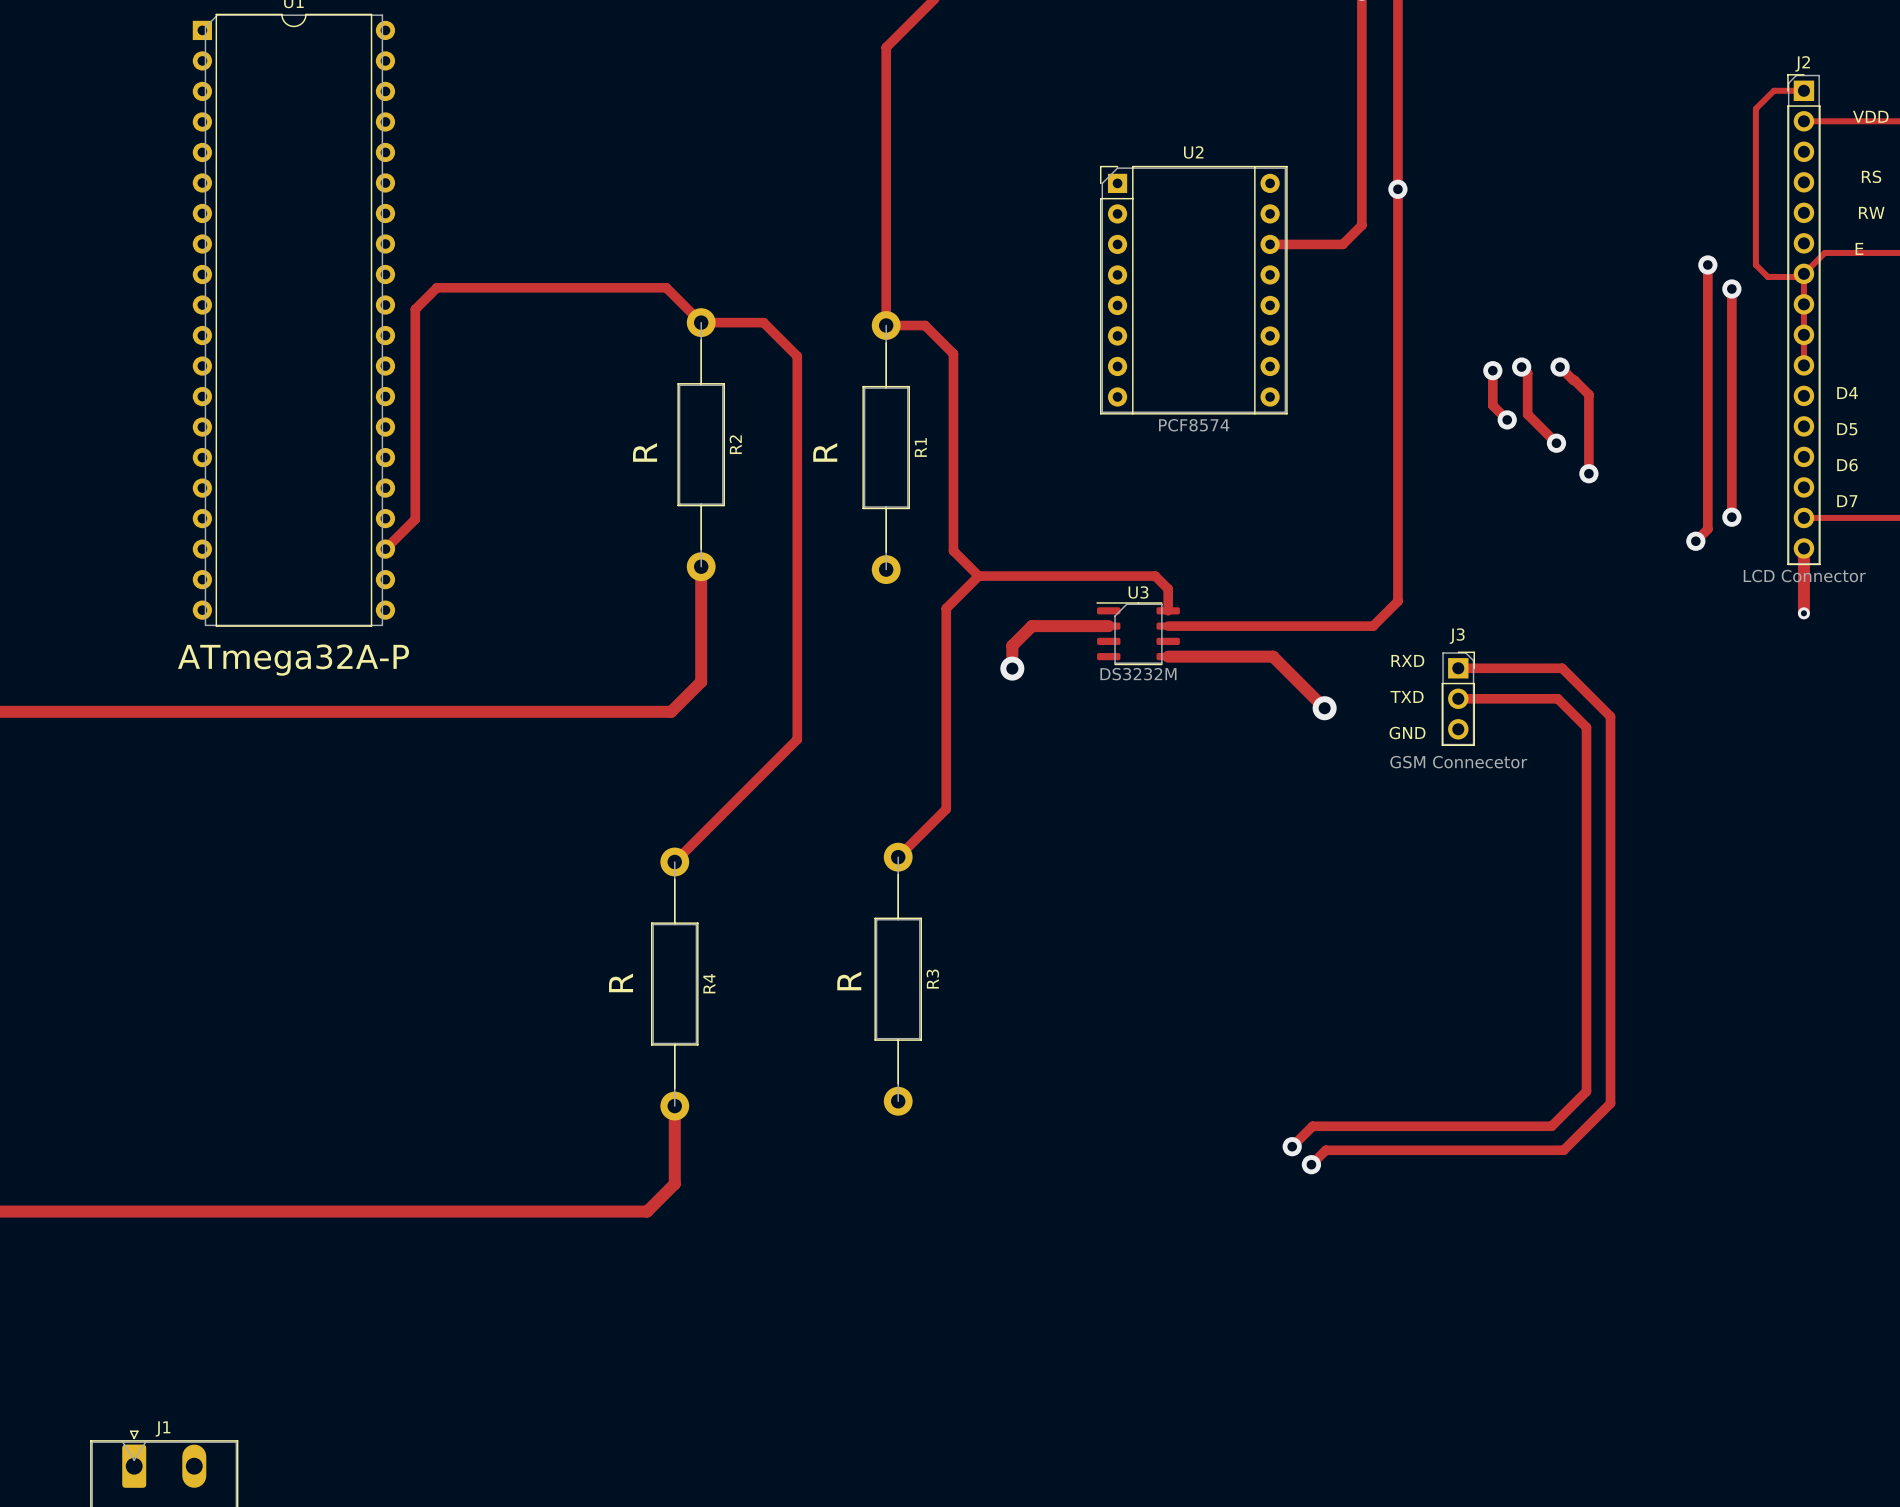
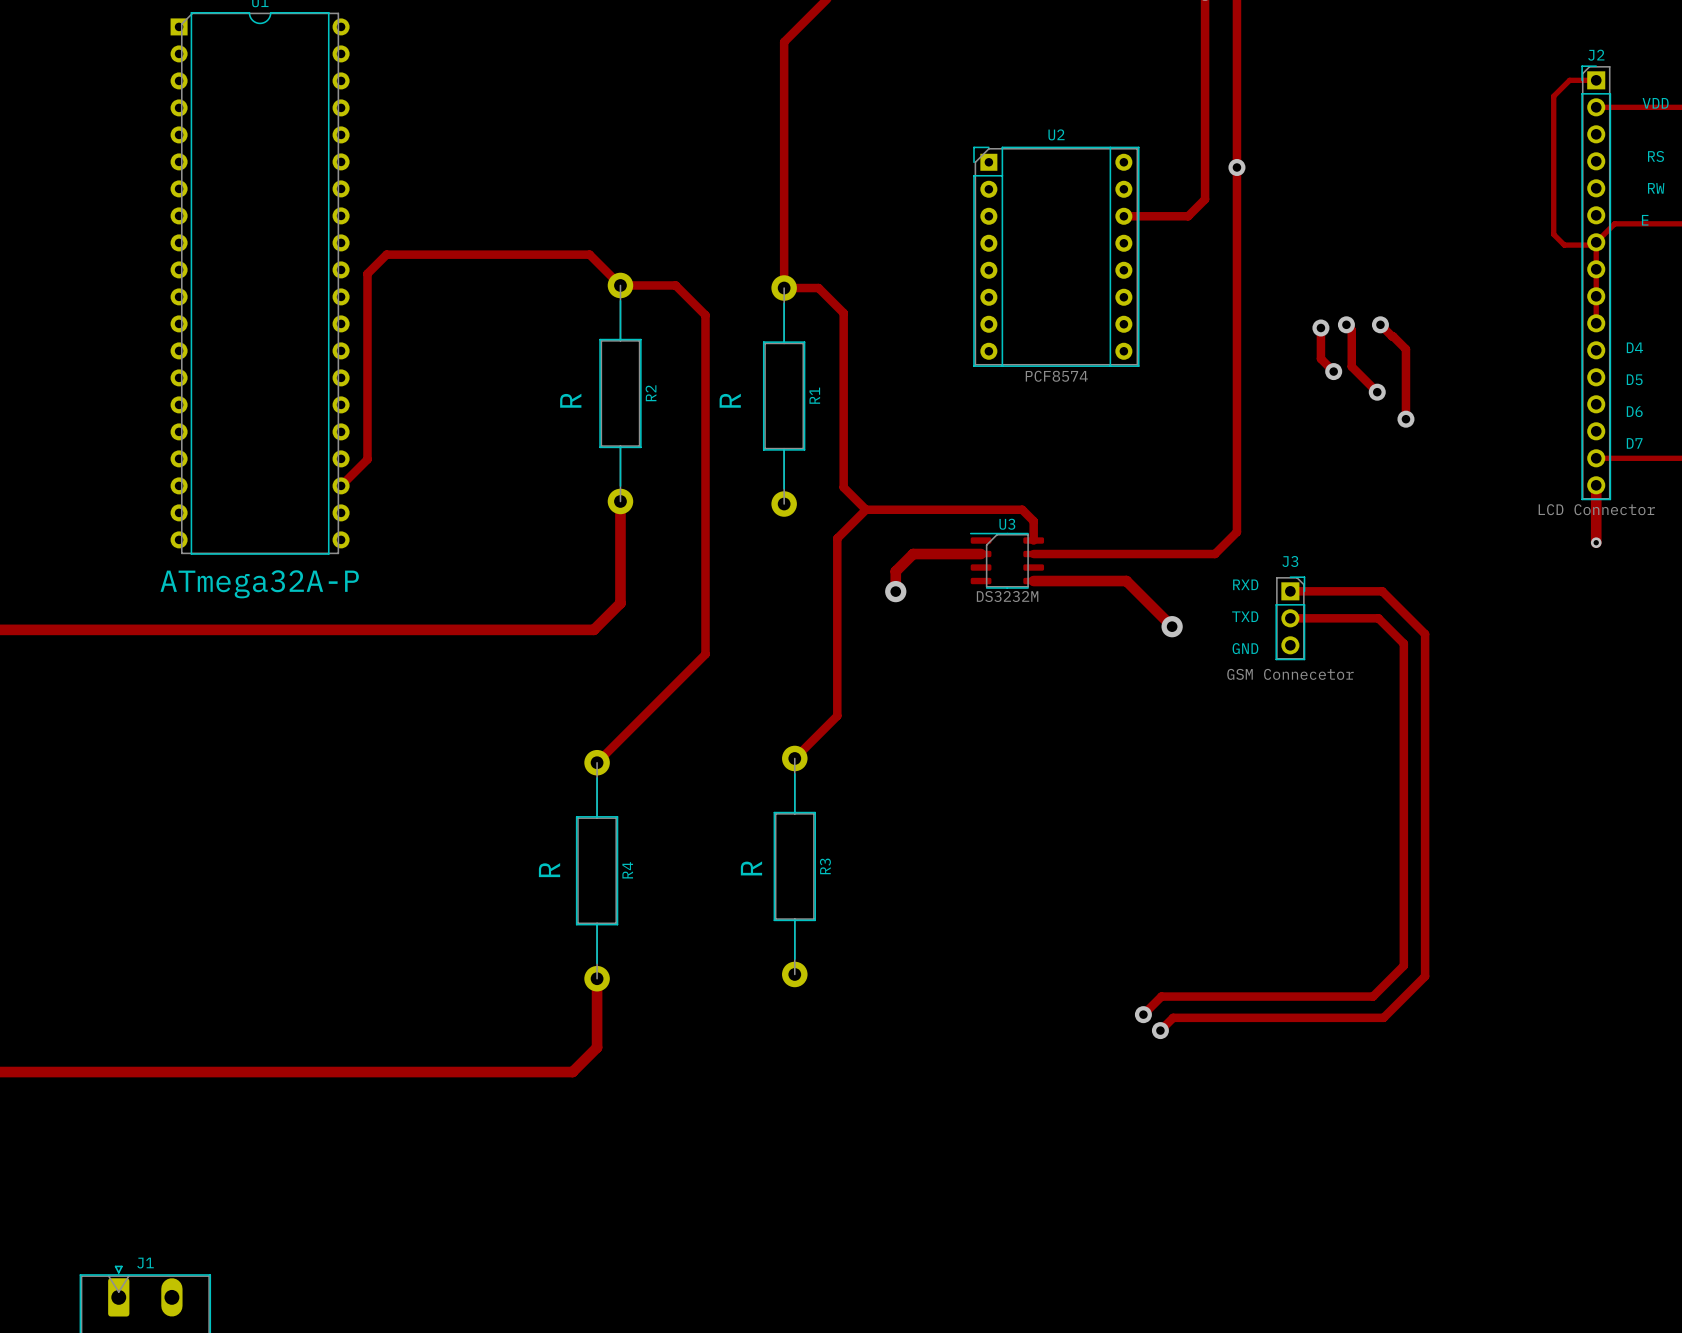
track: (1707, 264) (1707, 529) (1695, 541) -> none
via: (1707, 264) -> none
track: (1731, 288) (1731, 517) -> none
via: (1731, 288) -> none
via: (1731, 517) -> none
via: (1695, 541) -> none

